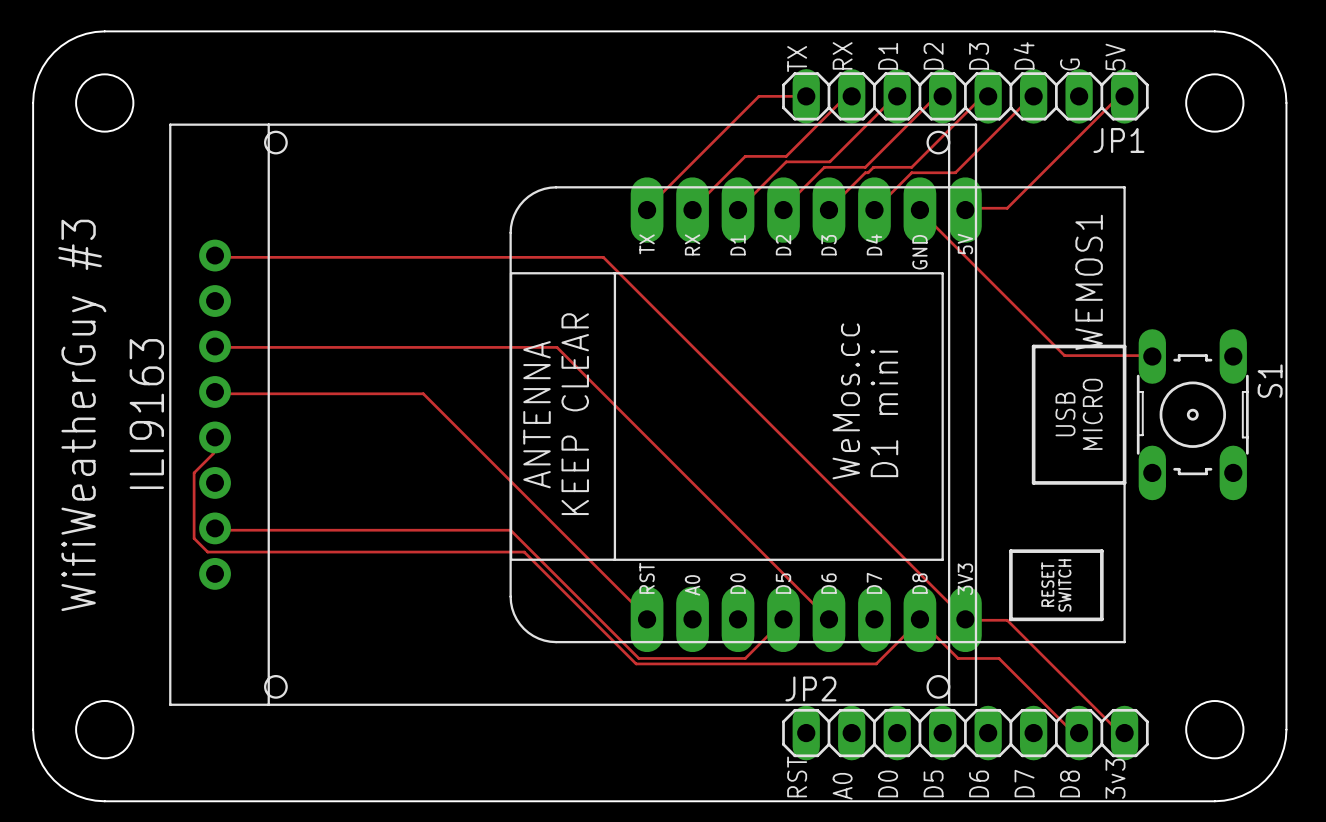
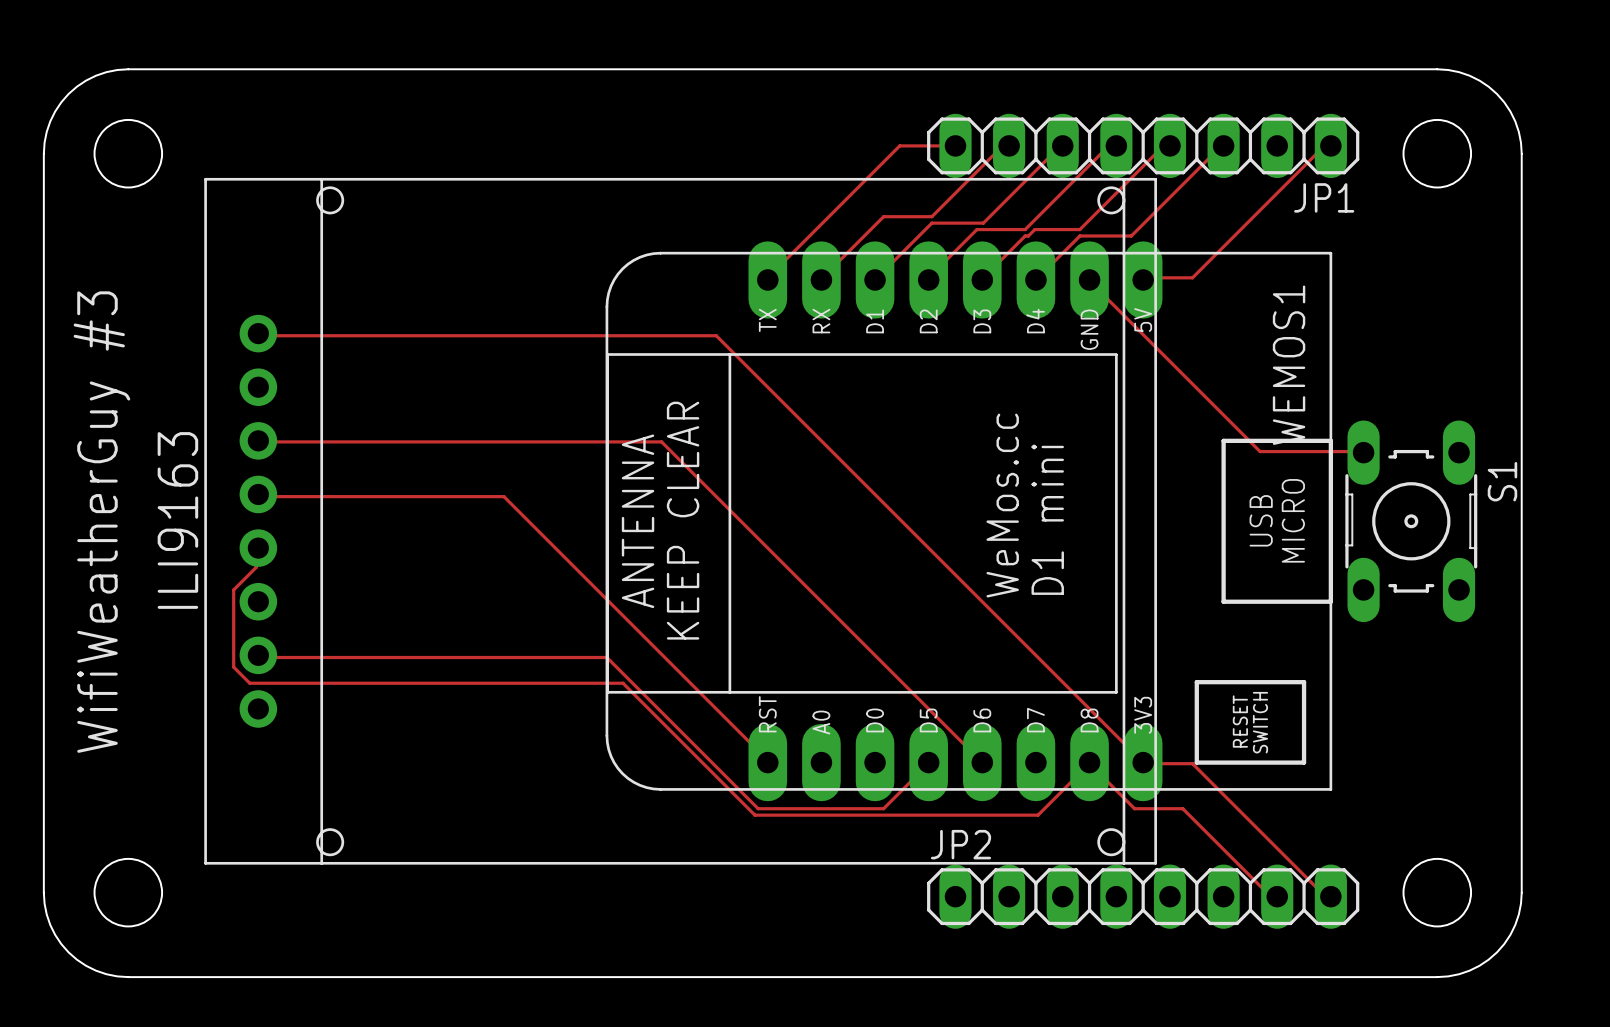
text: RX (842, 55) -> none
text: D4 (1024, 55) -> none
text: D1 (888, 56) -> none
text: D2 (933, 56) -> none
text: D3 (979, 56) -> none
text: 5V (1115, 57) -> none
text: TX (797, 59) -> none
text: G (1070, 64) -> none
text: RST (797, 776) -> none
text: 3v3 (1115, 778) -> none
text: D0 (888, 783) -> none
text: D5 (933, 783) -> none
text: D6 (979, 783) -> none
text: D7 (1024, 783) -> none
text: D8 (1070, 783) -> none
text: A0 (842, 786) -> none

